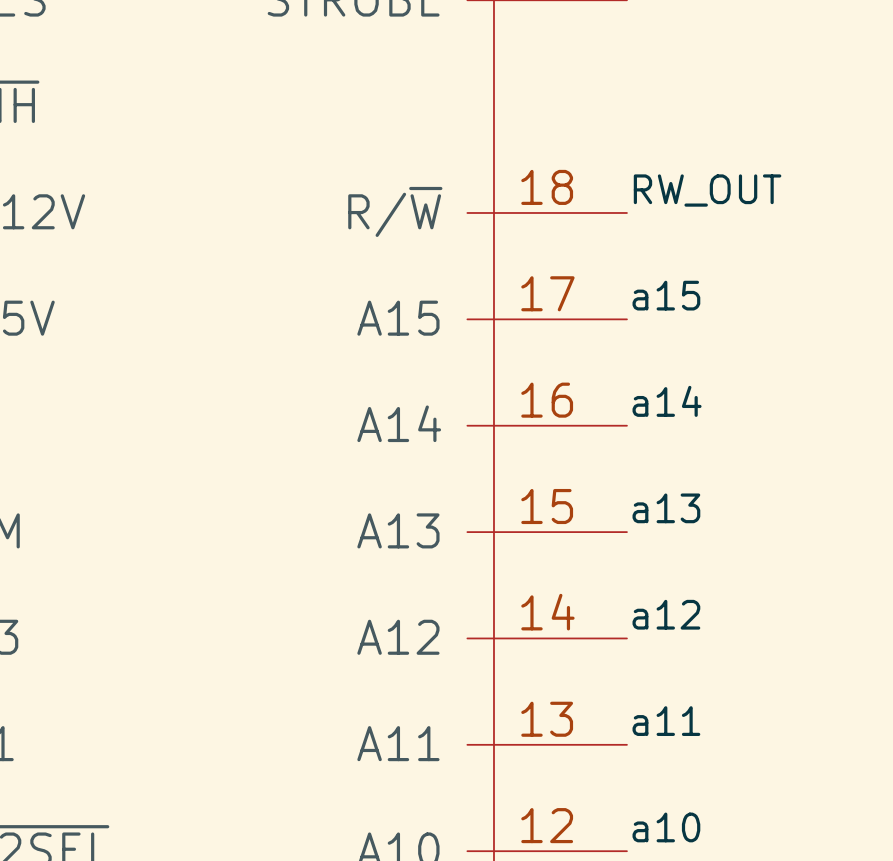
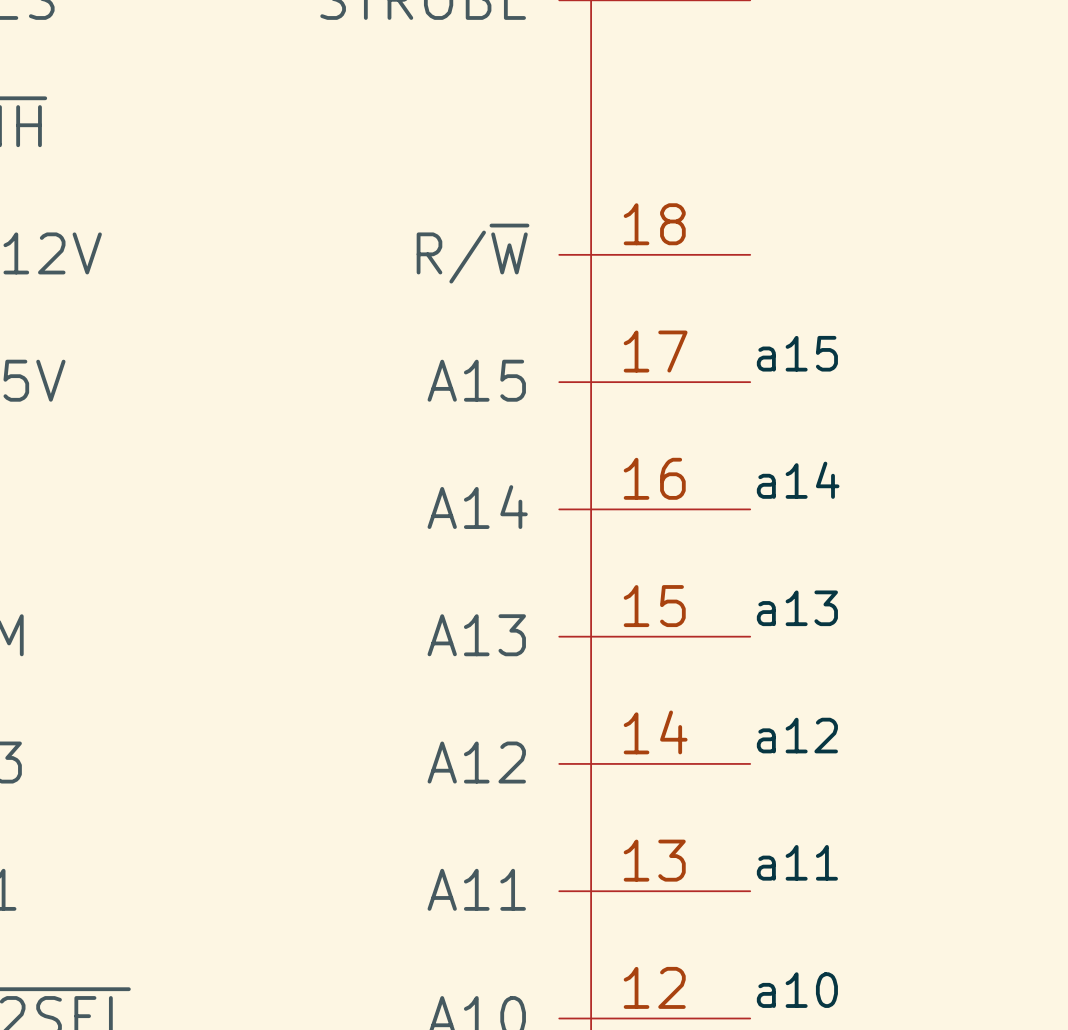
label: RW_OUT (707, 190) -> none

